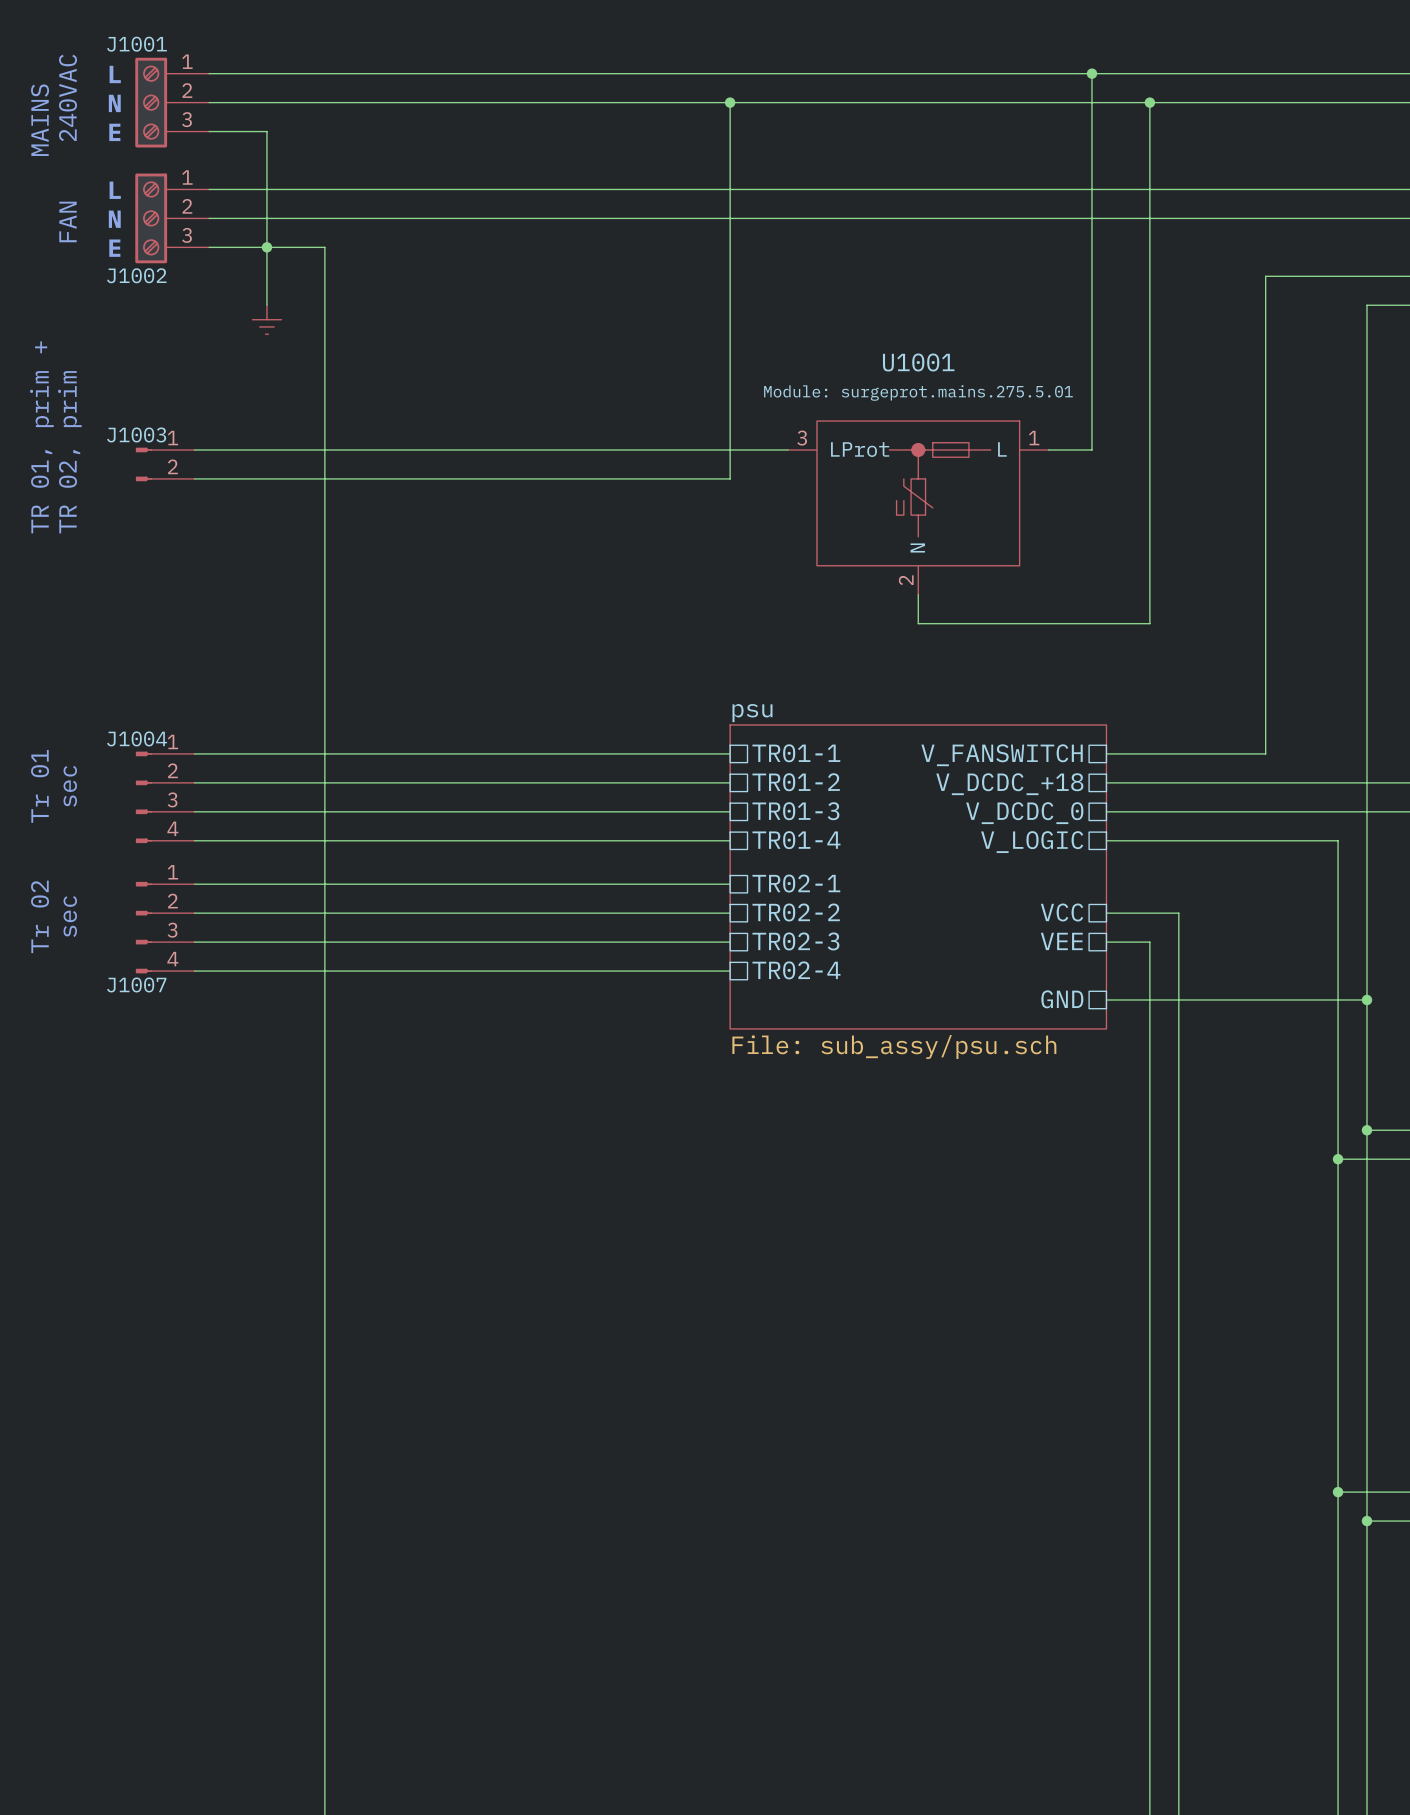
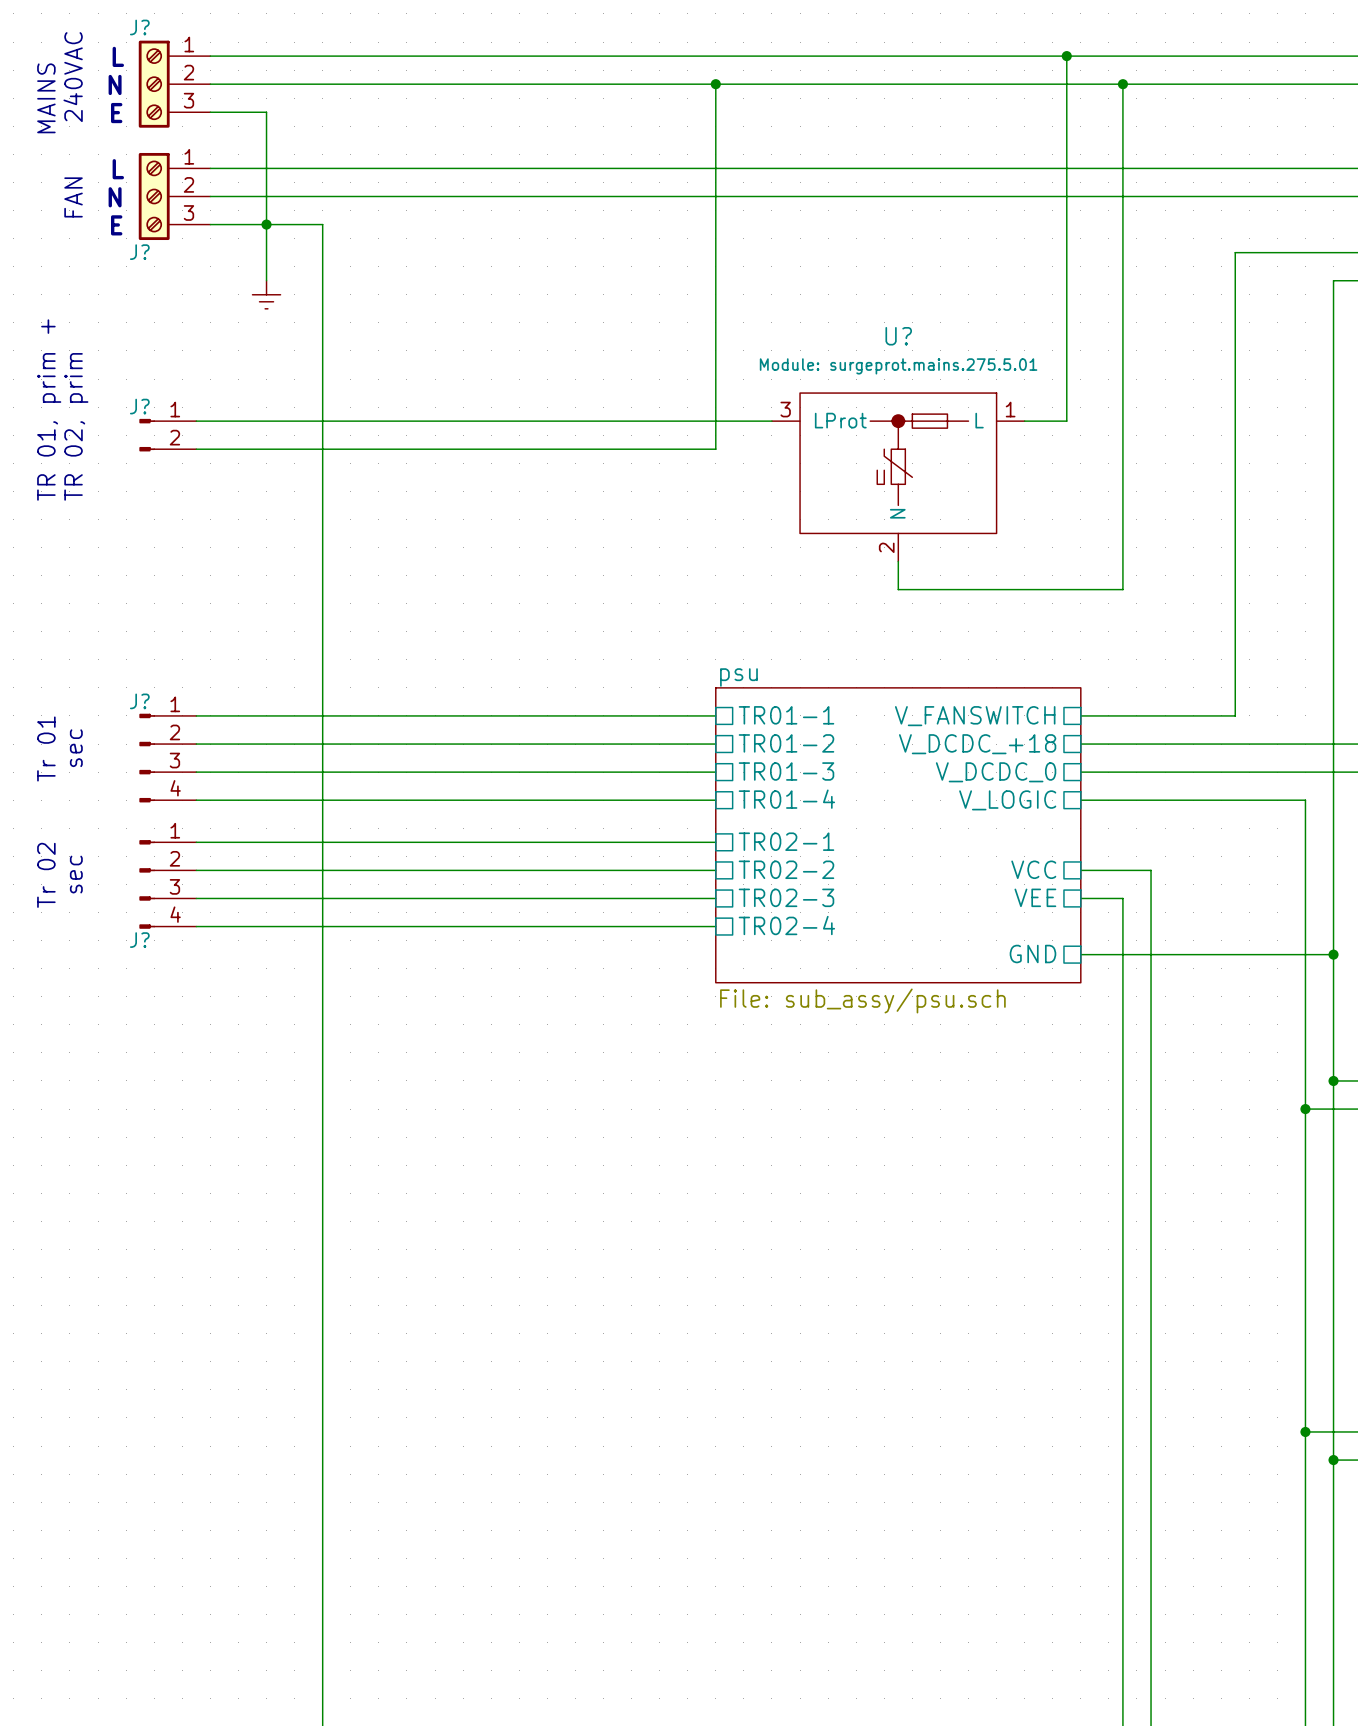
J1001 name: J1001 (136, 44) -> J? (139, 27)
J1002 name: J1002 (136, 275) -> J? (139, 252)
U1001 name: U1001 (918, 362) -> U? (898, 336)
J1003 name: J1003 (136, 434) -> J? (139, 406)
J1004 name: J1004 (137, 738) -> J? (139, 701)
J1007 name: J1007 (136, 984) -> J? (139, 940)

